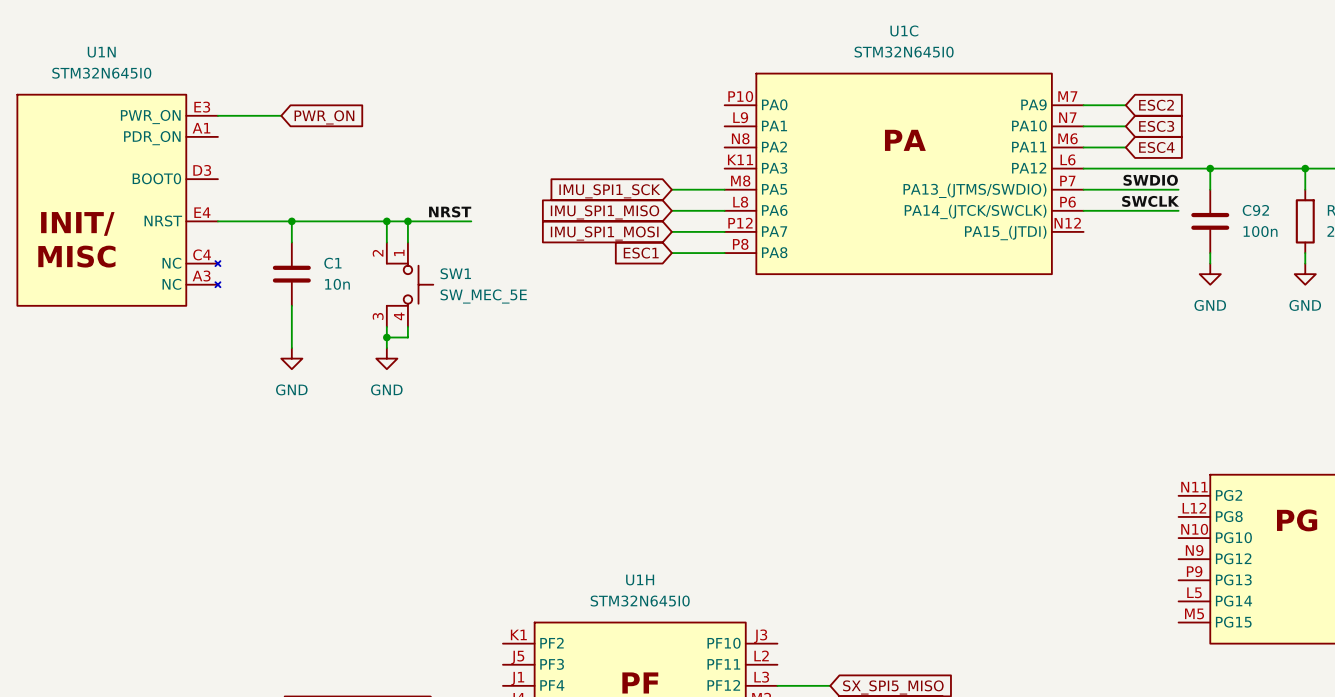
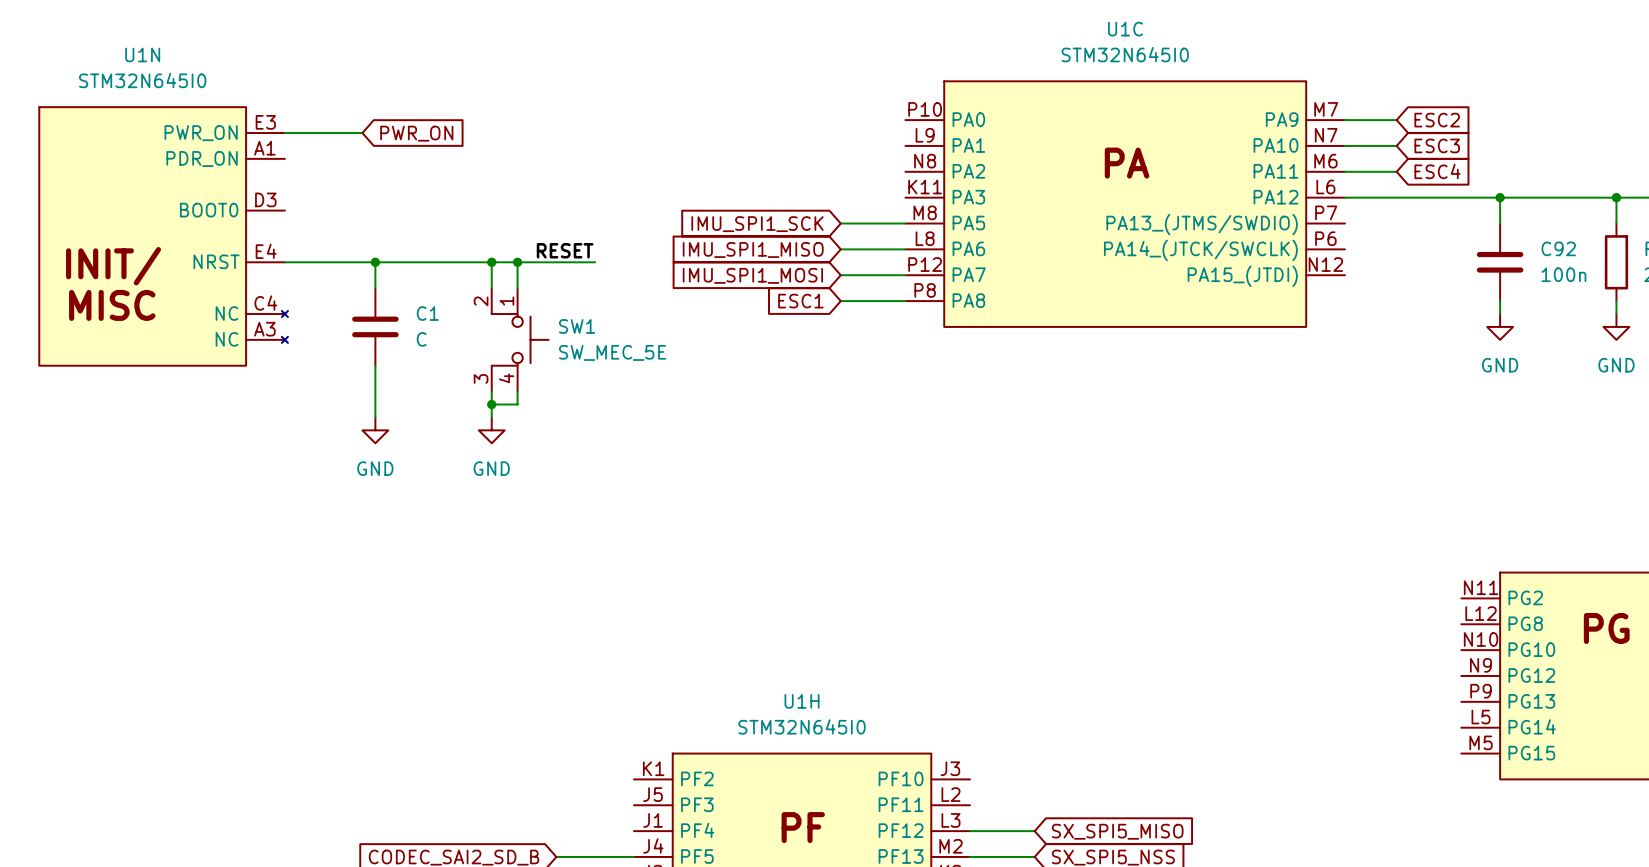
label: SWDIO (1150, 180) -> none
wire: (1083, 189) (1178, 189) -> none
label: SWCLK (1150, 201) -> none
wire: (1083, 210) (1178, 210) -> none
label: NRST (450, 211) -> RESET (565, 250)
C1 value: 10n (337, 284) -> C (421, 339)

